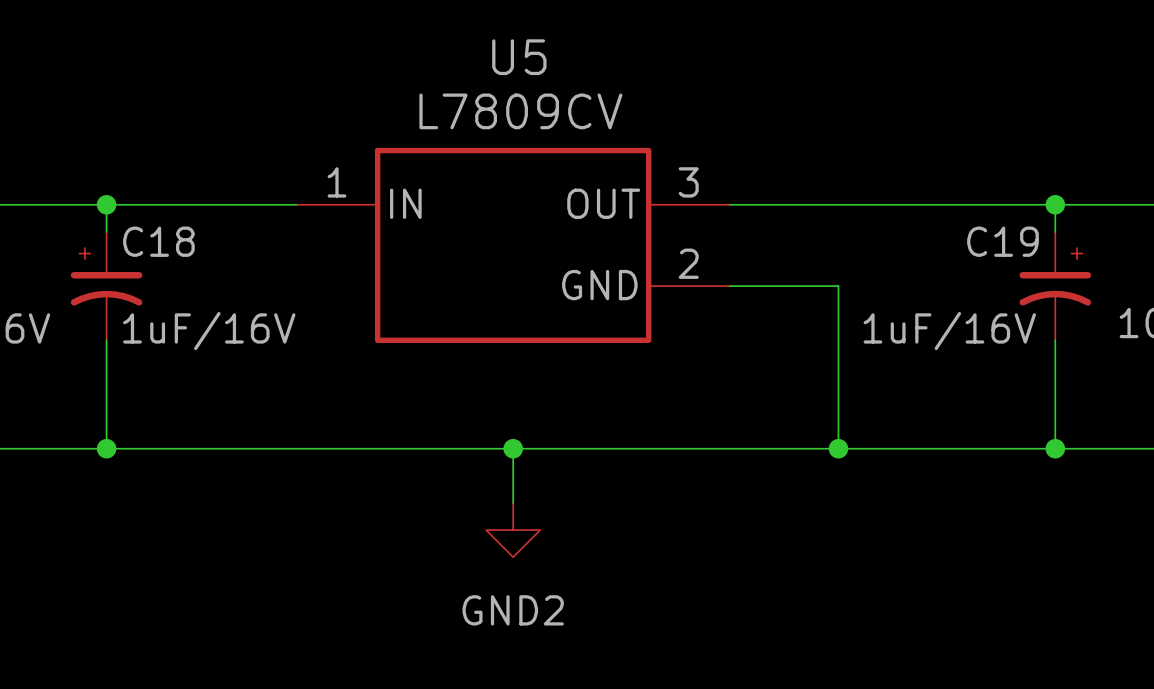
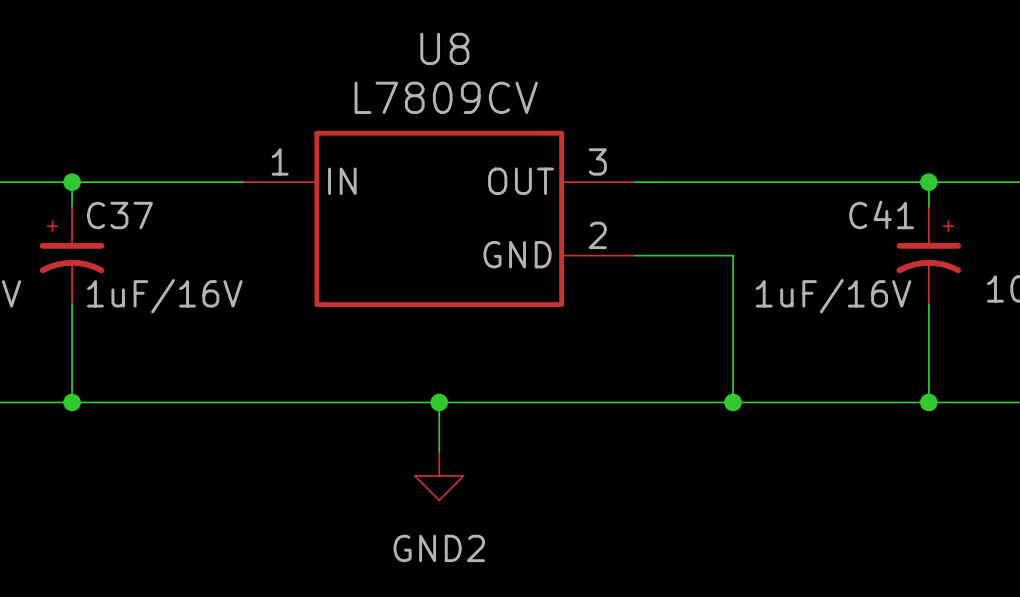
U5 name: U5 (519, 57) -> U8 (444, 48)
C18 name: C18 (158, 241) -> C37 (119, 215)
C19 name: C19 (1002, 241) -> C41 (881, 214)

